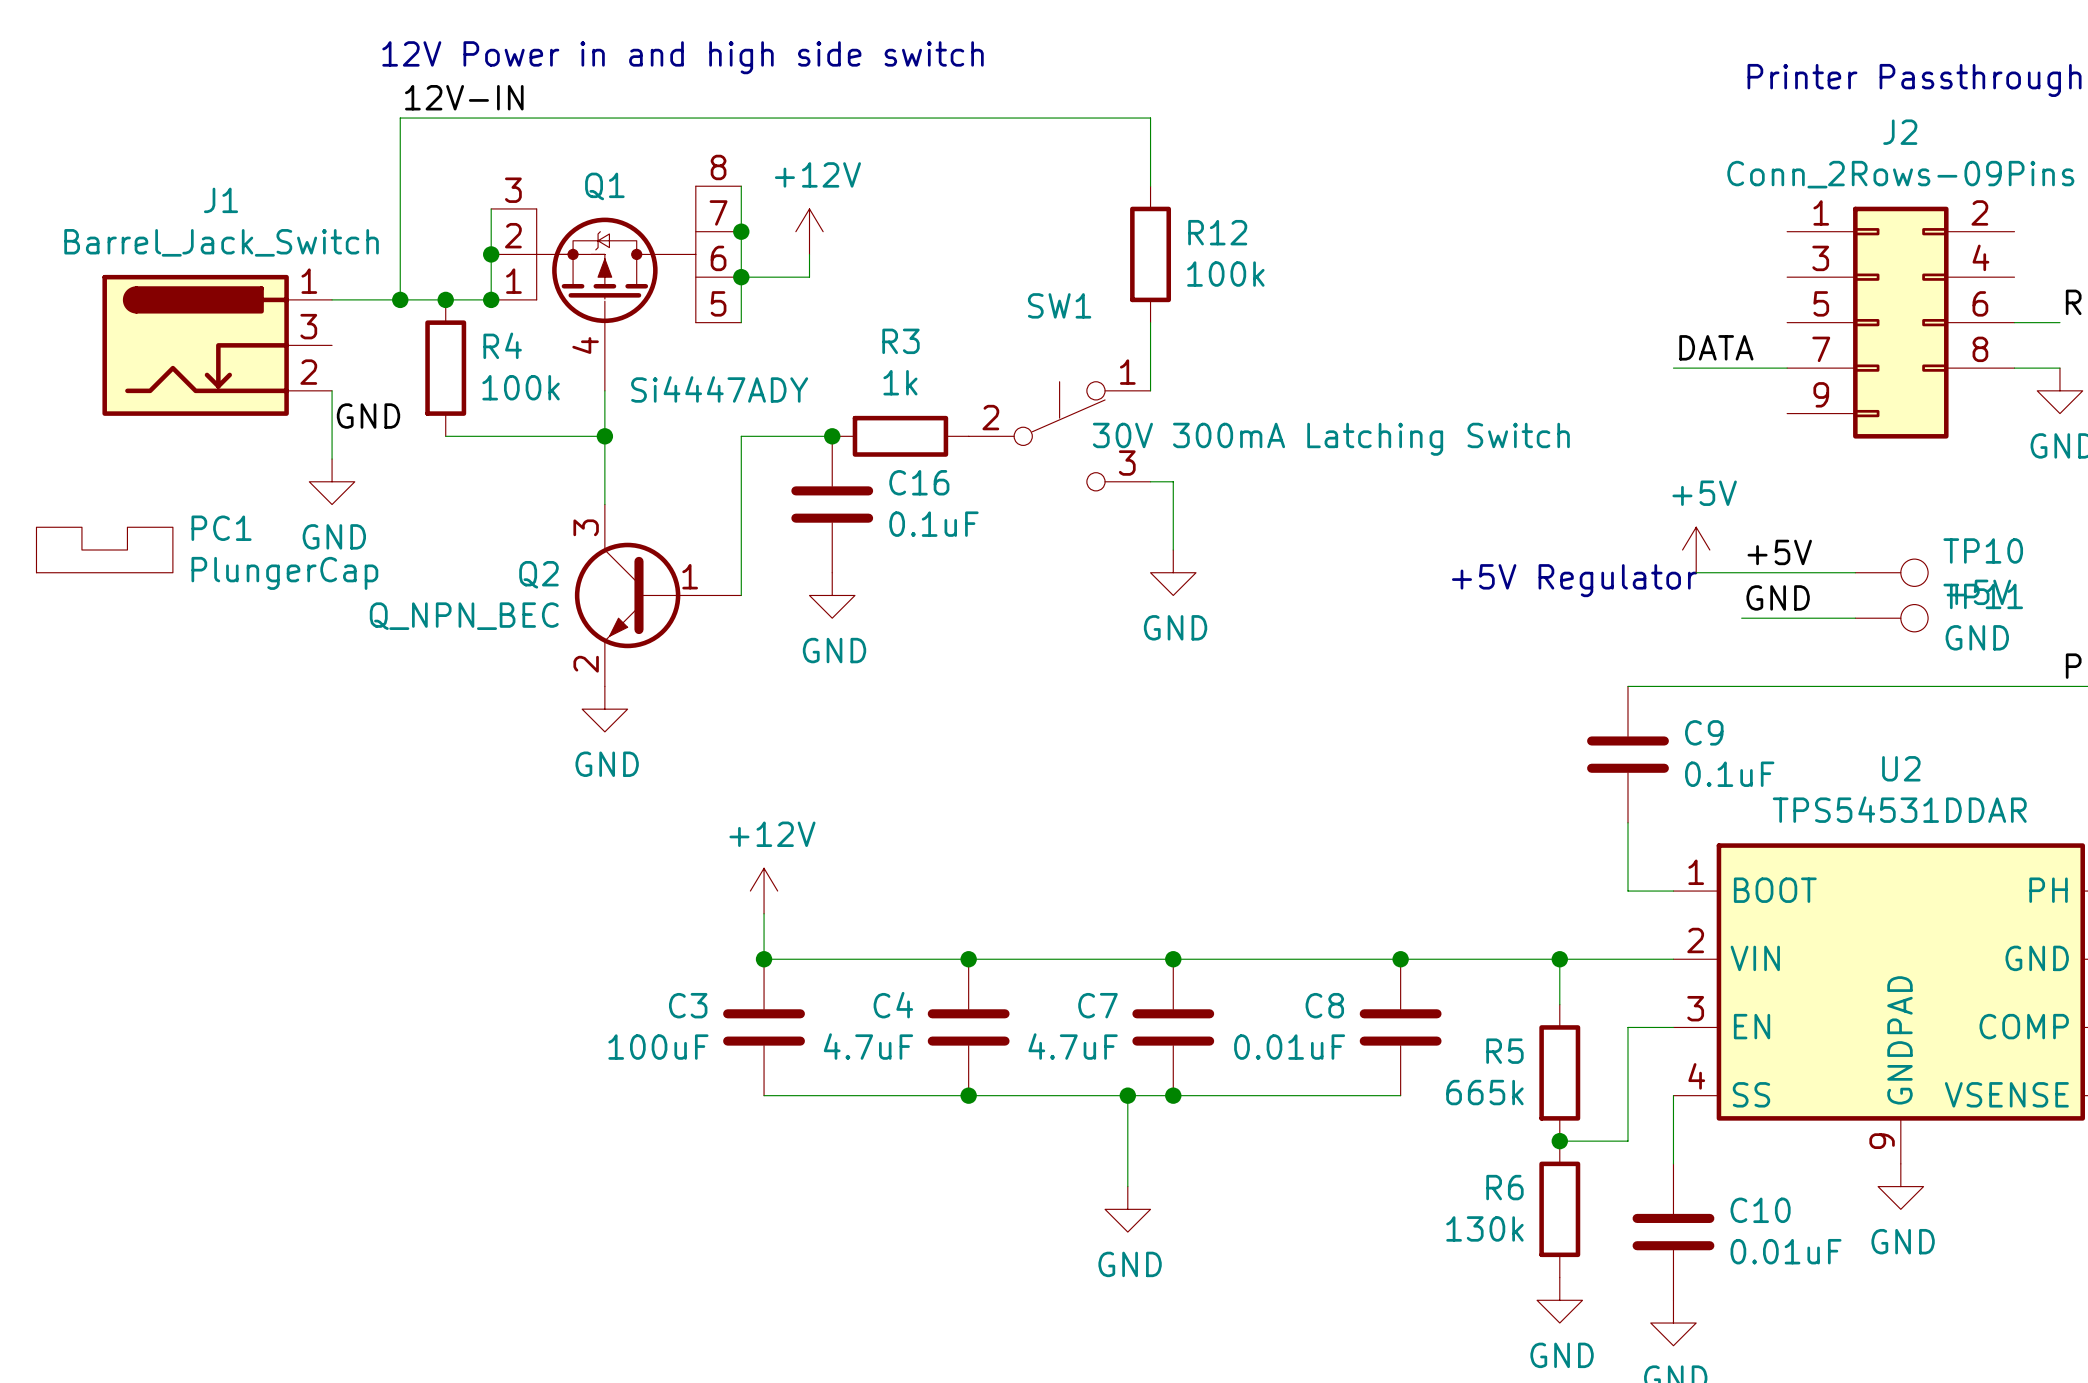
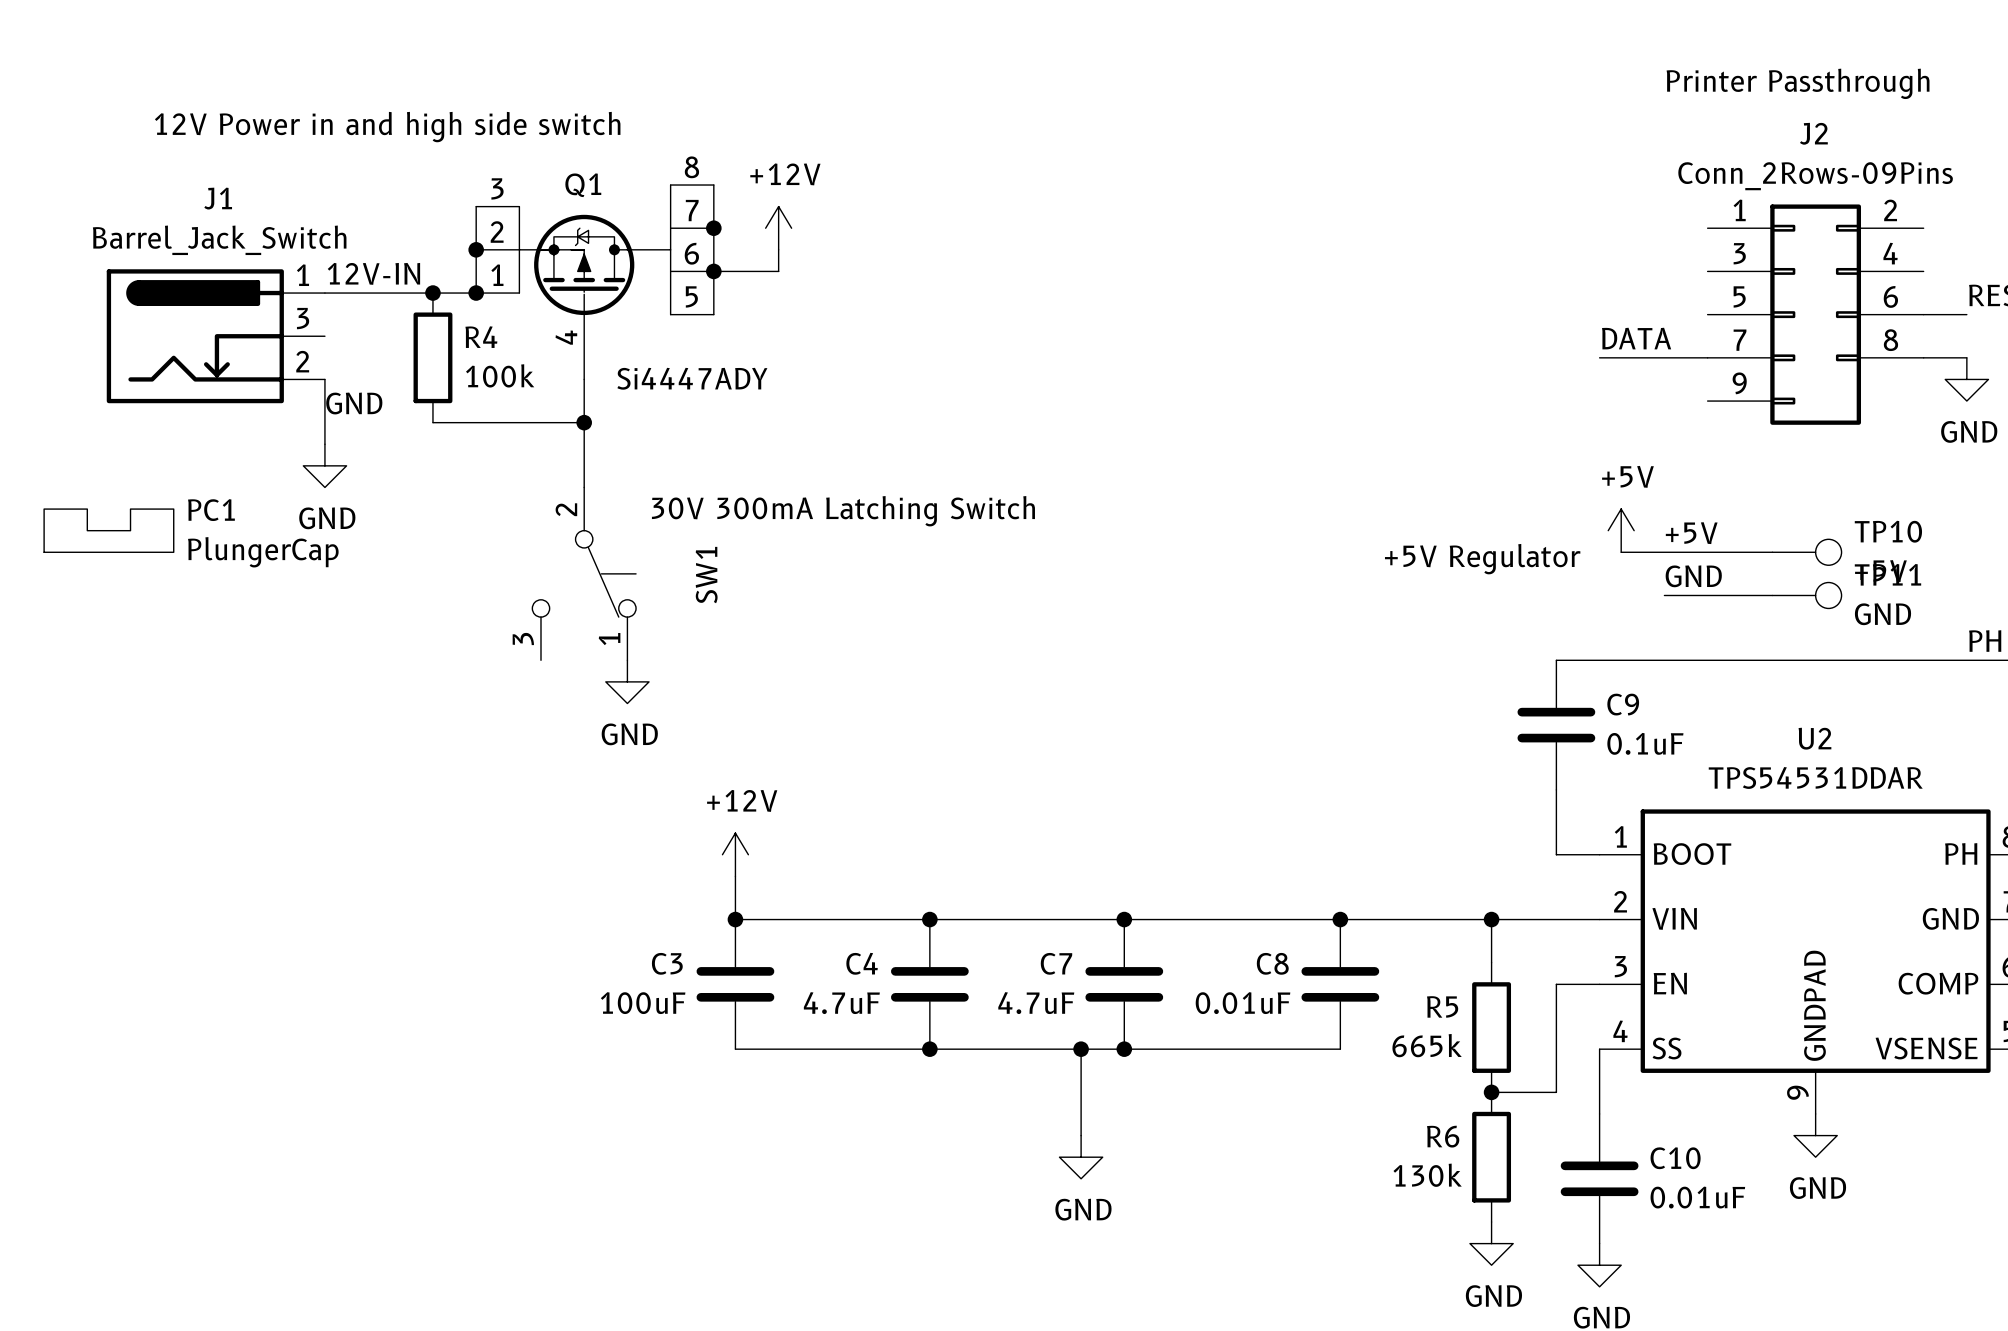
text position: 12V Power in and high side switch (683, 57) -> 12V Power in and high side switch (387, 127)
label position: 12V-IN (464, 97) -> 12V-IN (373, 273)
wire: (1150, 186) (1150, 118) (400, 118) (400, 299) -> none
R12: 100k (1150, 254) -> none
junction: (400, 299) -> none
wire: (1150, 322) (1150, 390) -> none
wire: (832, 436) (741, 436) (741, 595) -> none
junction: (832, 436) -> none
R3: 1k (900, 436) -> none
SW1 rotation: 0° (1059, 436) -> 90° clockwise (584, 573)
SW1 position: (1059, 436) -> (584, 573)
SW1 value position: 30V 300mA Latching Switch (1331, 439) -> 30V 300mA Latching Switch (843, 511)
wire: (1150, 481) (1173, 481) (1173, 550) -> none
C16: 0.1uF (832, 504) -> none
power symbol: GND (1173, 572) -> none
Q2: Q_NPN_BEC (658, 595) -> none
power symbol: GND (832, 595) -> none
power symbol position: GND (604, 709) -> GND (627, 681)

